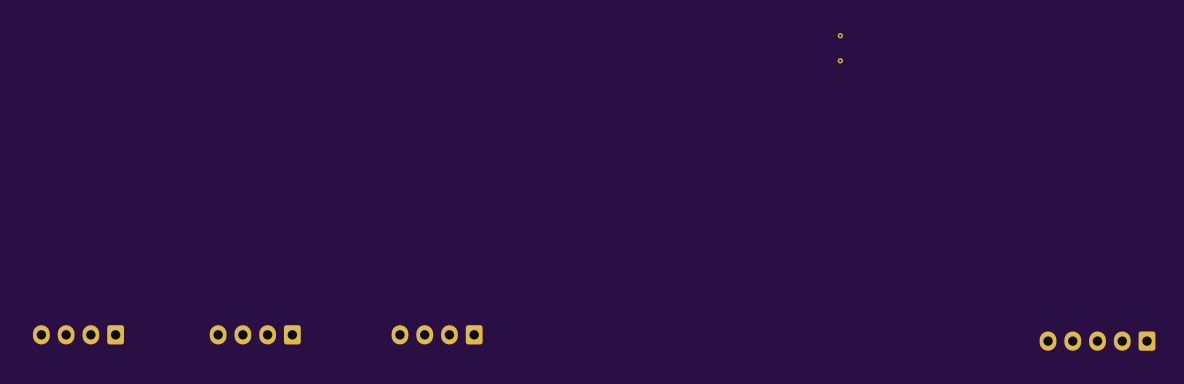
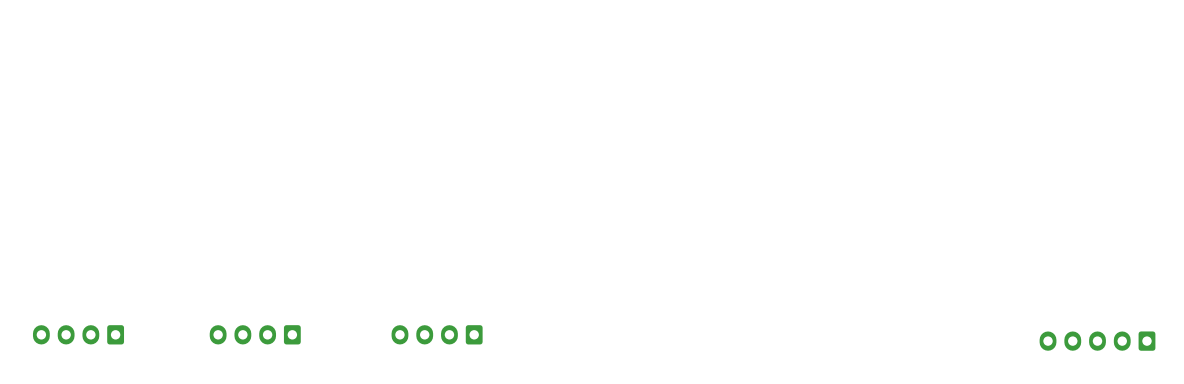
via: (840, 35) -> none
via: (840, 60) -> none

